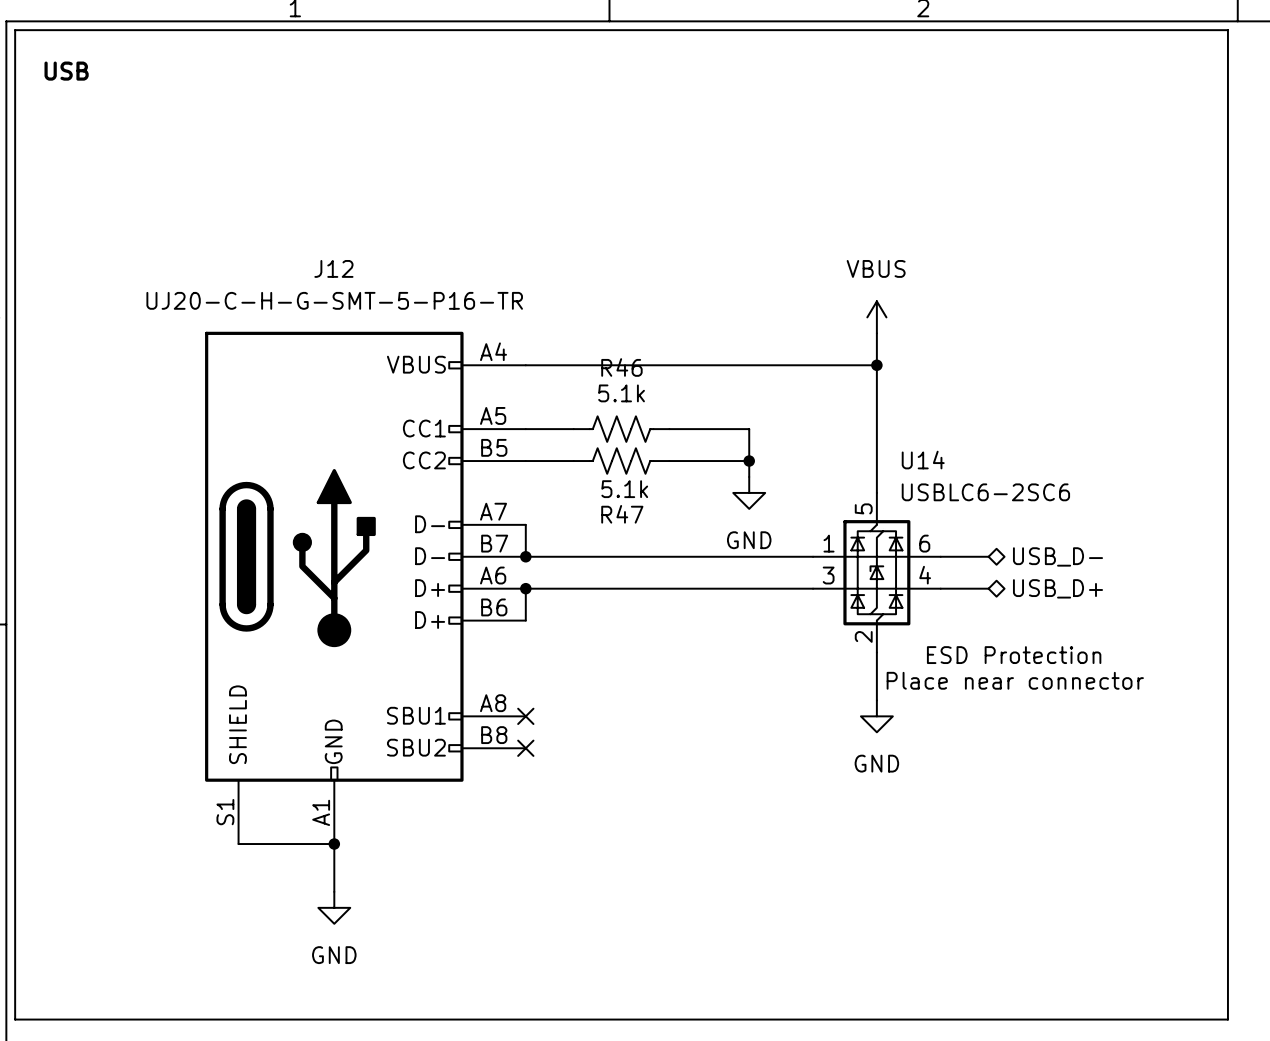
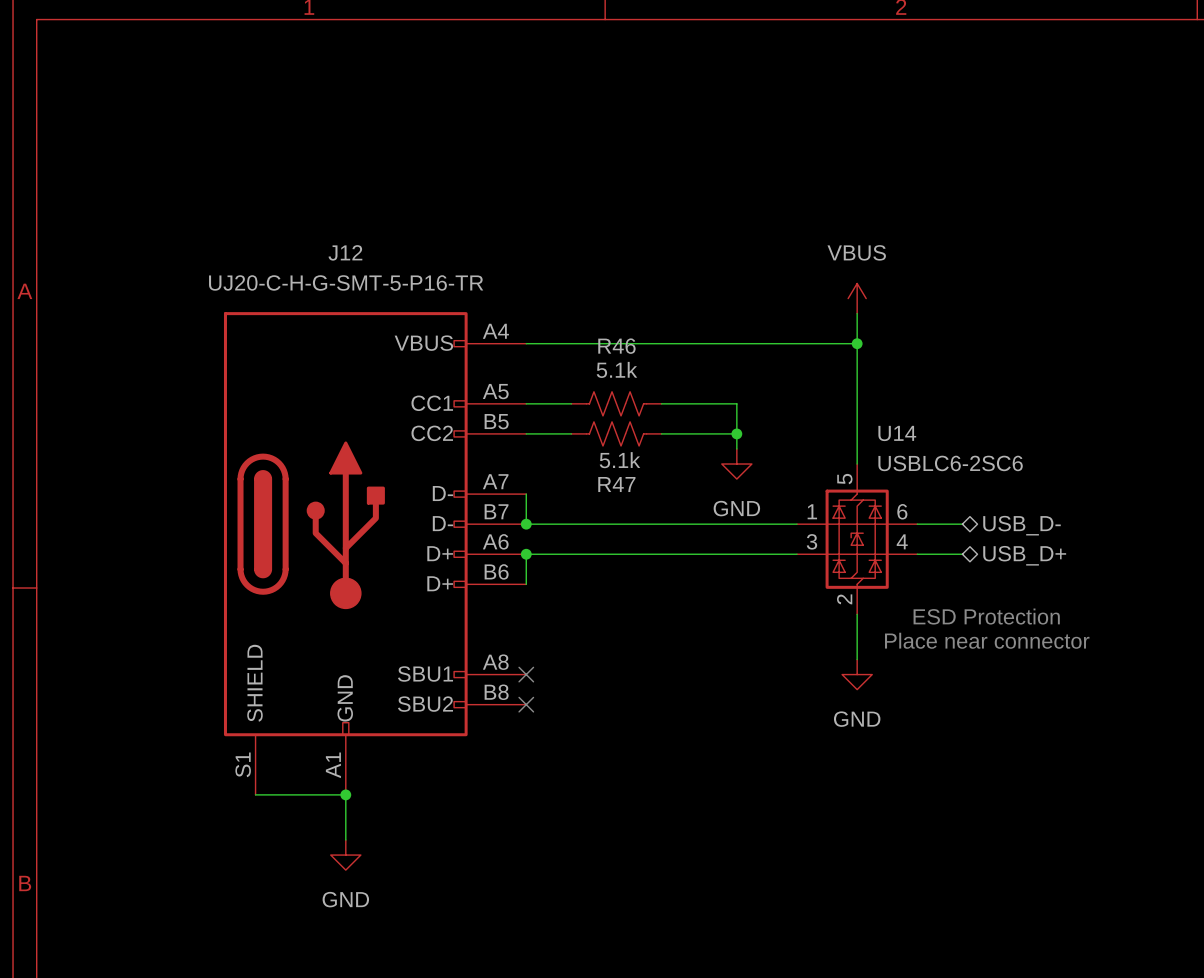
line: (15, 30) (1227, 30) (1227, 1019) (15, 1019) (15, 30) -> none
text: USB (66, 71) -> none

